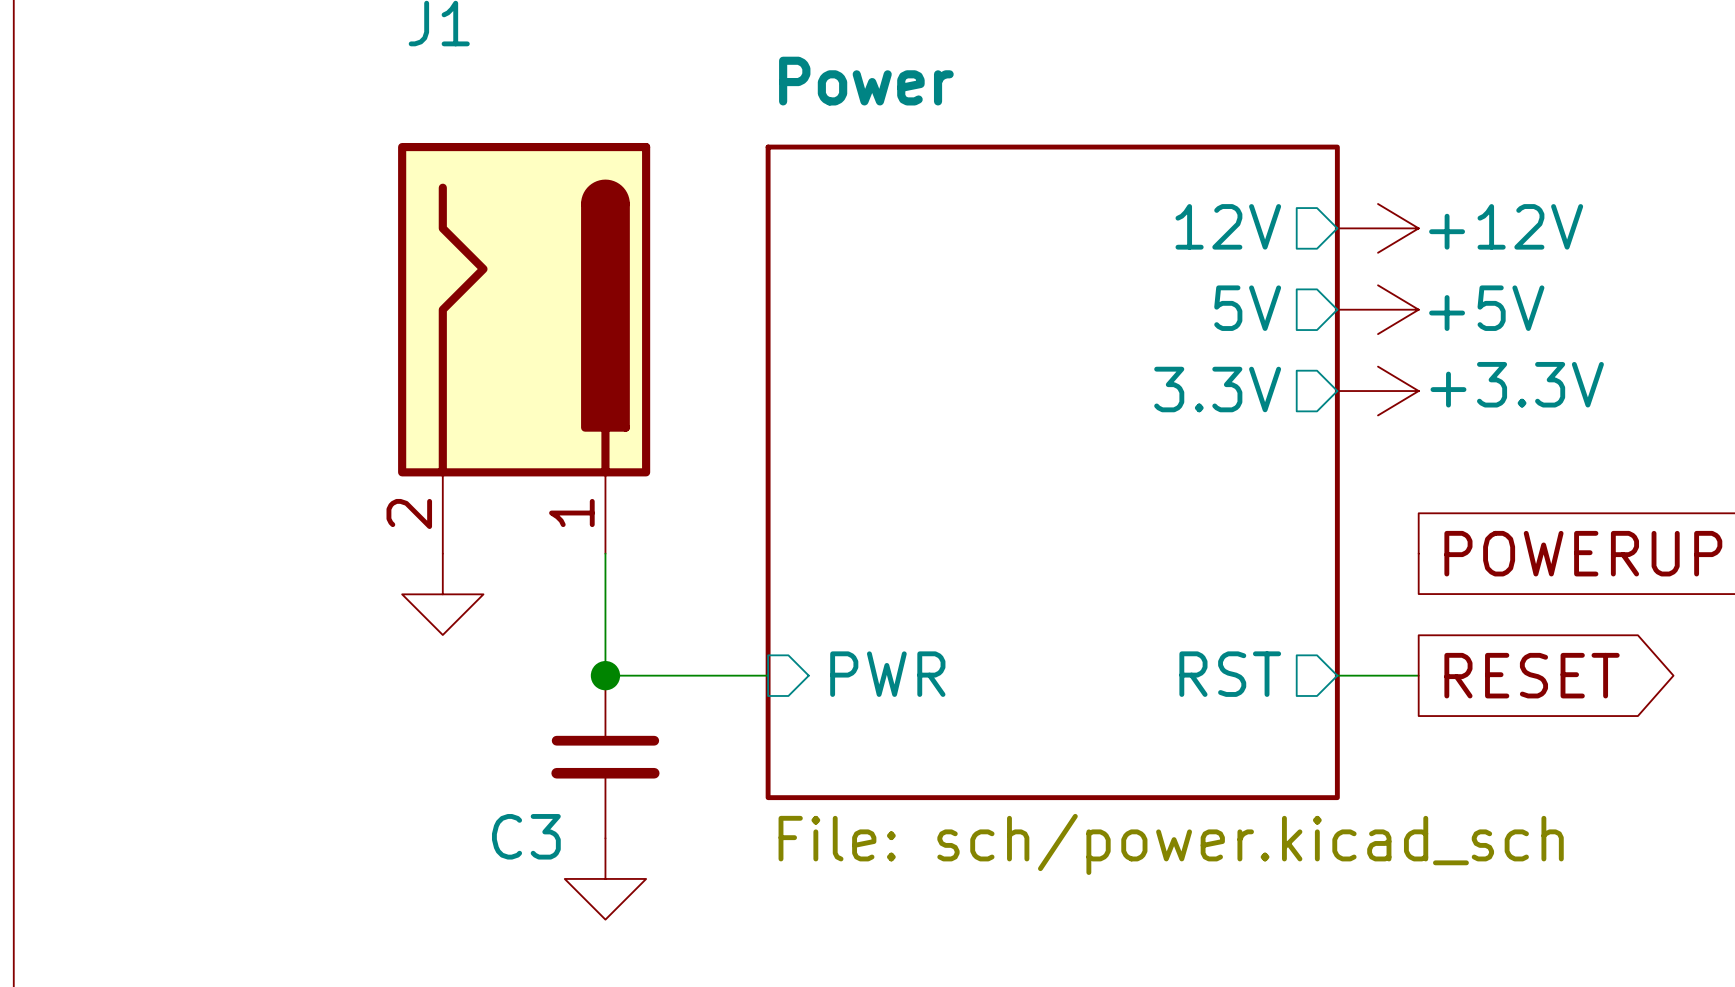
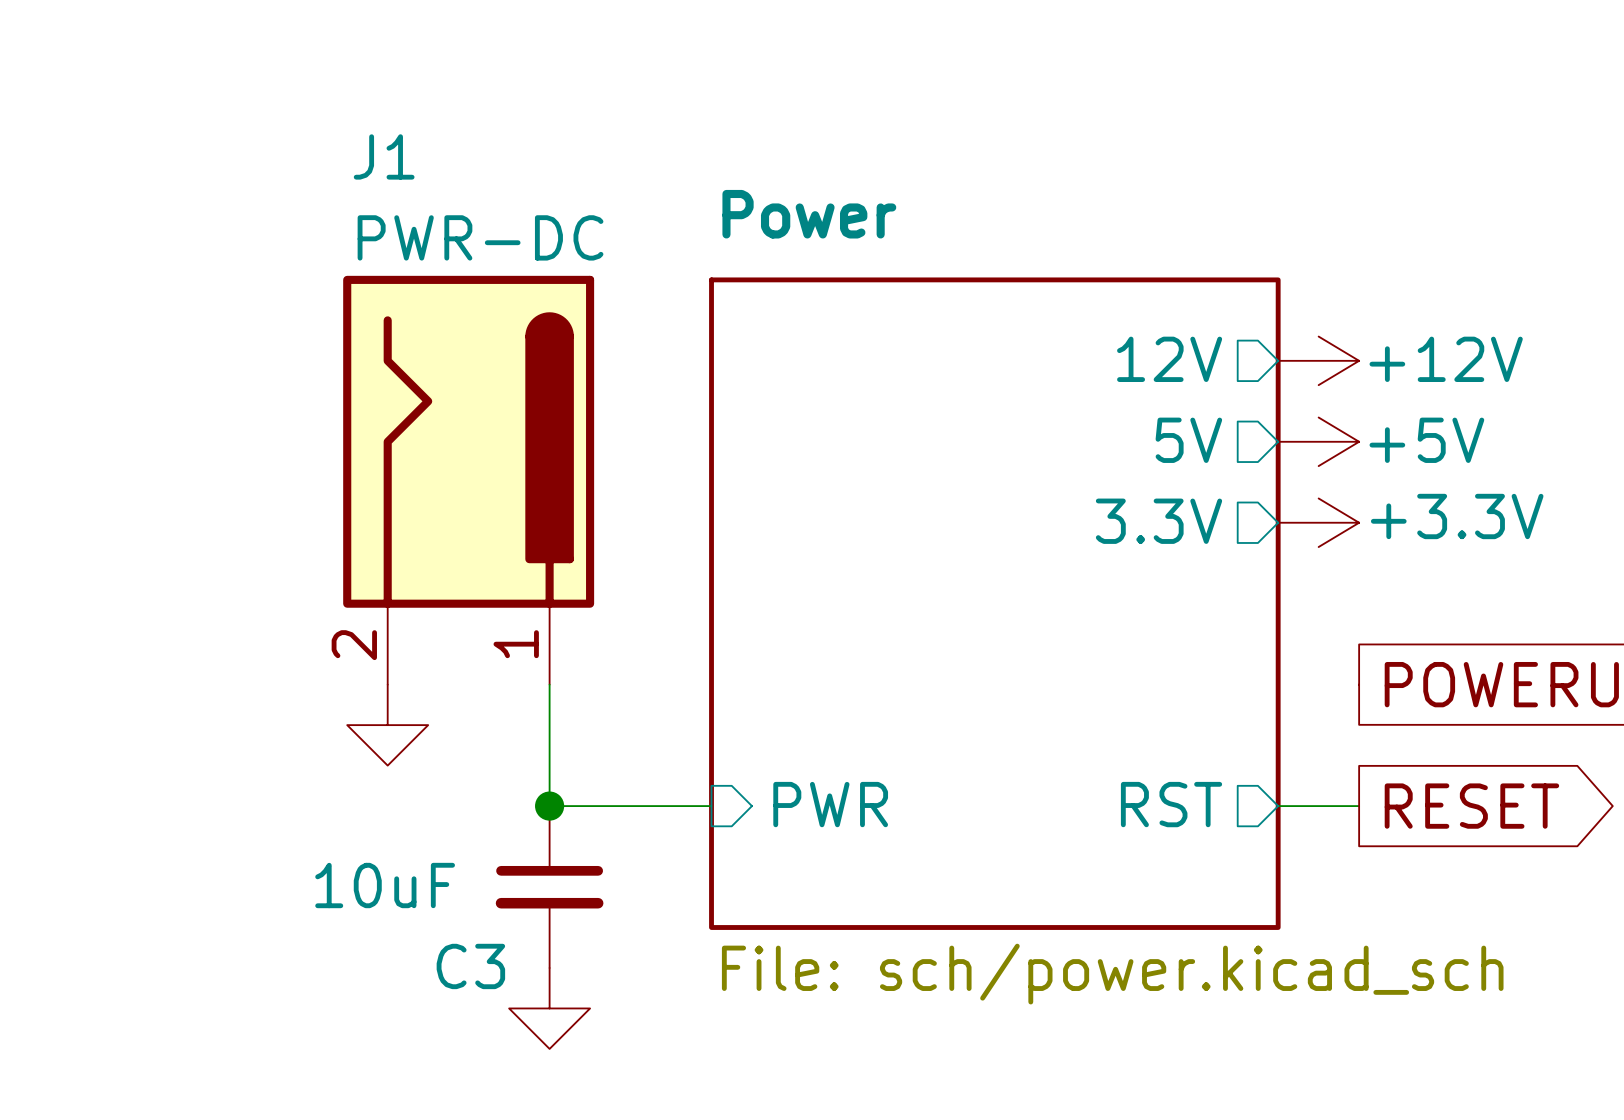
J1 value: none -> PWR-DC (480, 237)
C3 value: none -> 10uF (385, 885)

